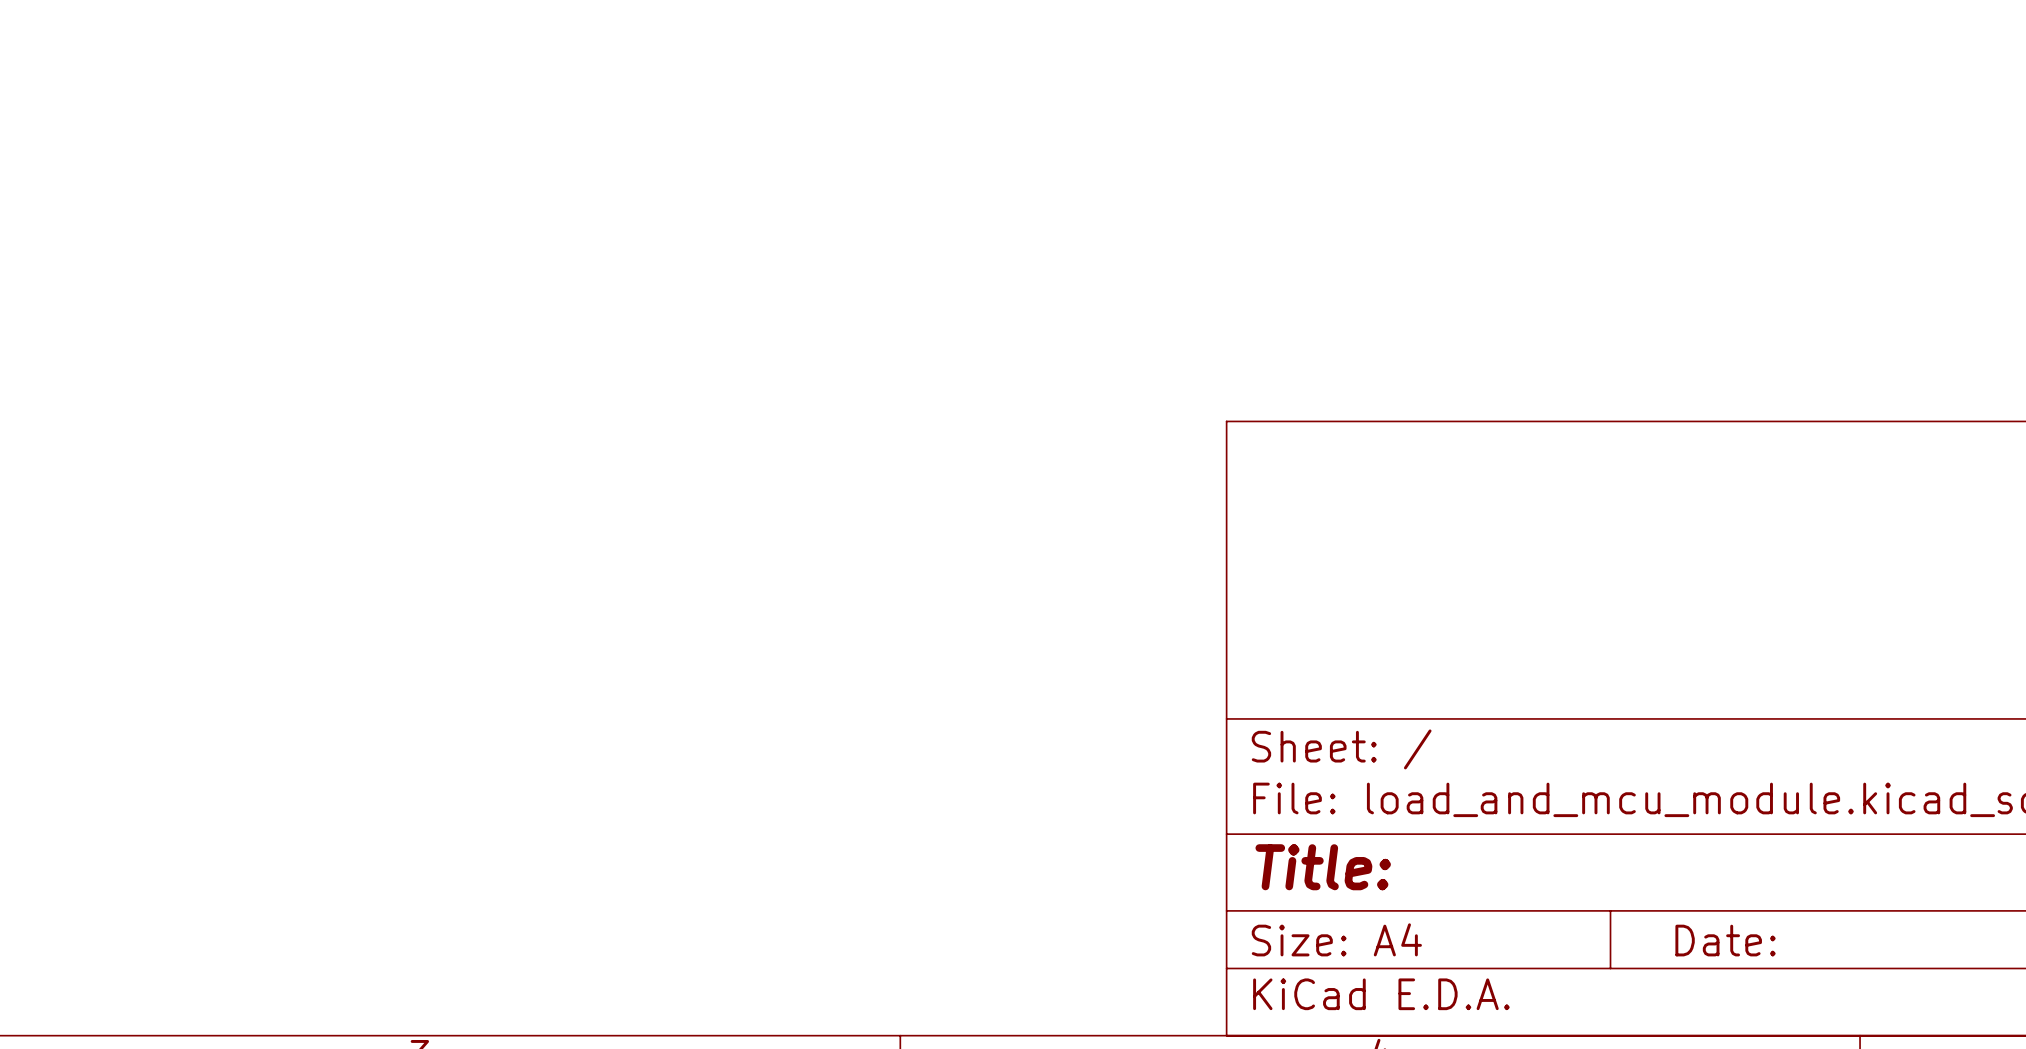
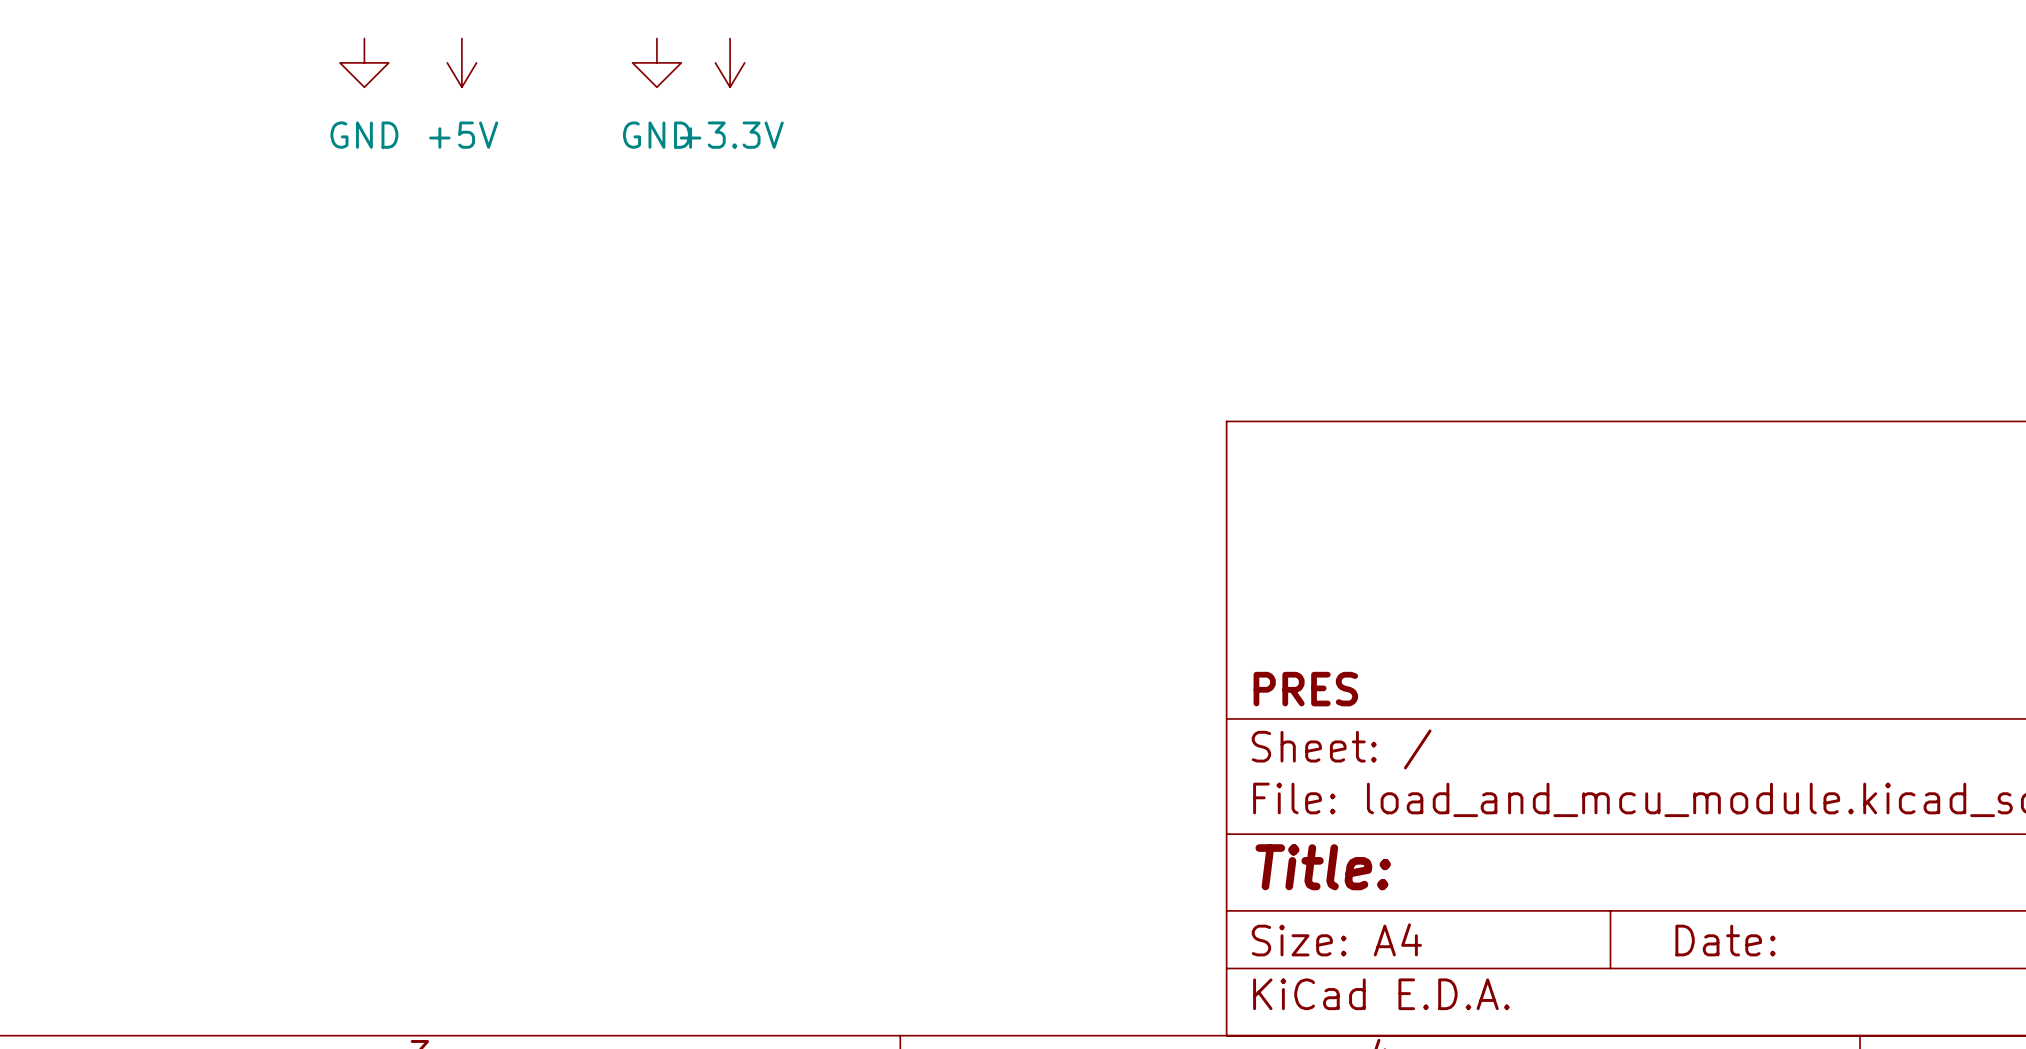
power symbol: none -> GND (364, 62)
power symbol: none -> +5V (461, 62)
power symbol: none -> GND (656, 62)
power symbol: none -> +3.3V (730, 62)
title block: none -> PRES (1305, 689)

